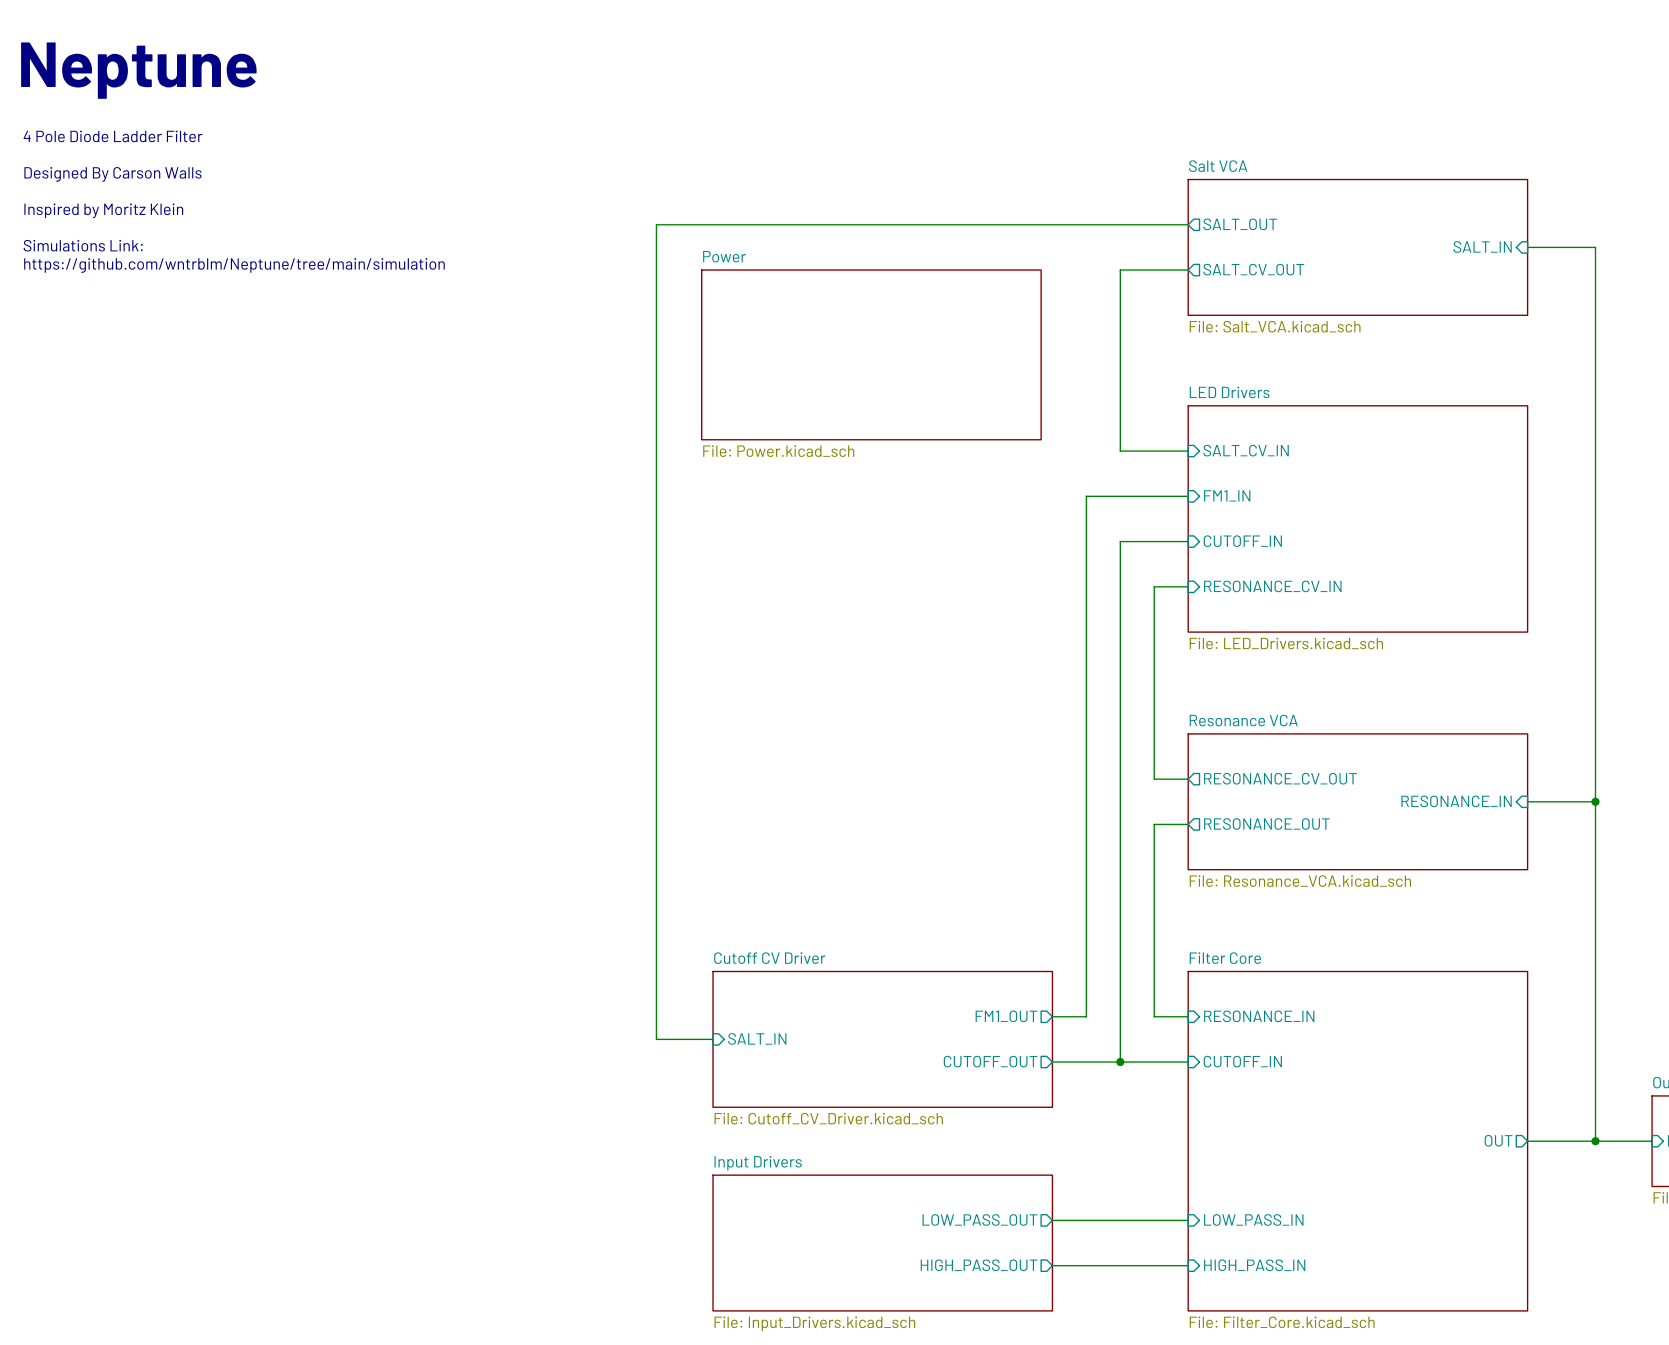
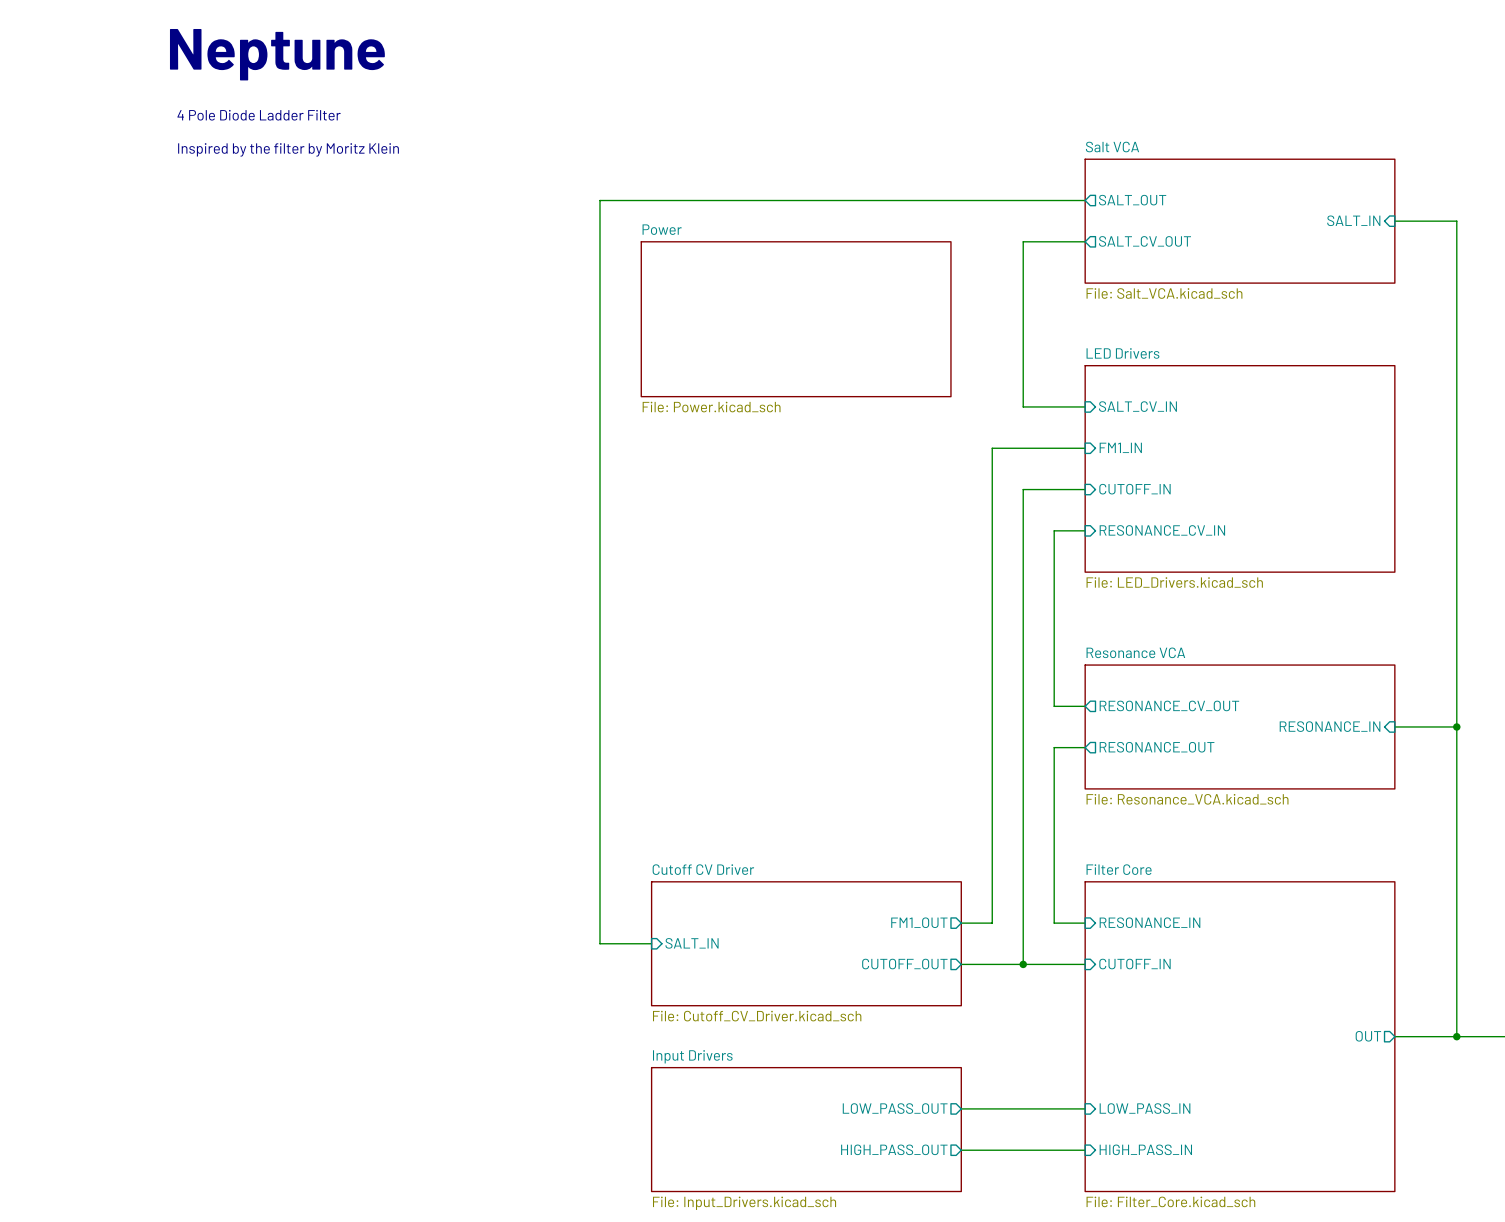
text position: Neptune (138, 70) -> Neptune (277, 54)
text position: 4 Pole Diode Ladder Filter (113, 136) -> 4 Pole Diode Ladder Filter (259, 115)
text: none -> Inspired by the filter by Moritz Klein (288, 149)
text: Designed By Carson Walls (112, 174) -> none
text: Inspired by Moritz Klein (103, 210) -> none
text: Simulations Link: (83, 245) -> none
text: https://github.com/wntrblm/Neptune/tree/main/simulation (234, 265) -> none

